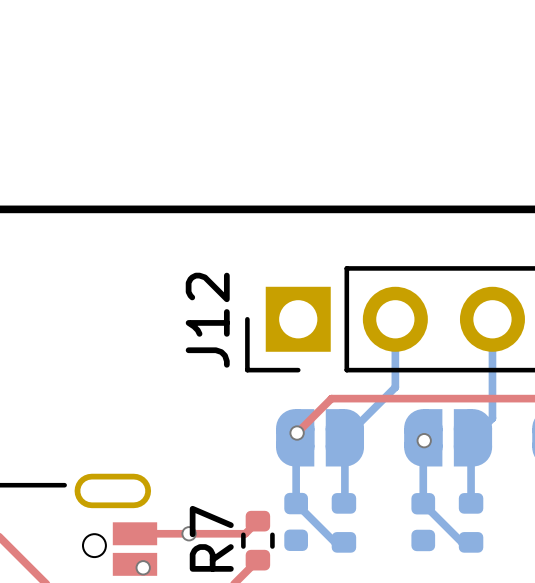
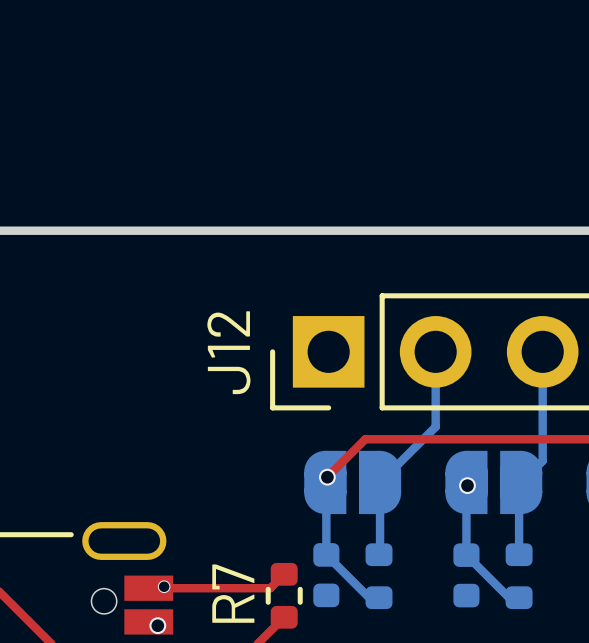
via: none -> (164, 586)
via: (189, 533) -> none

